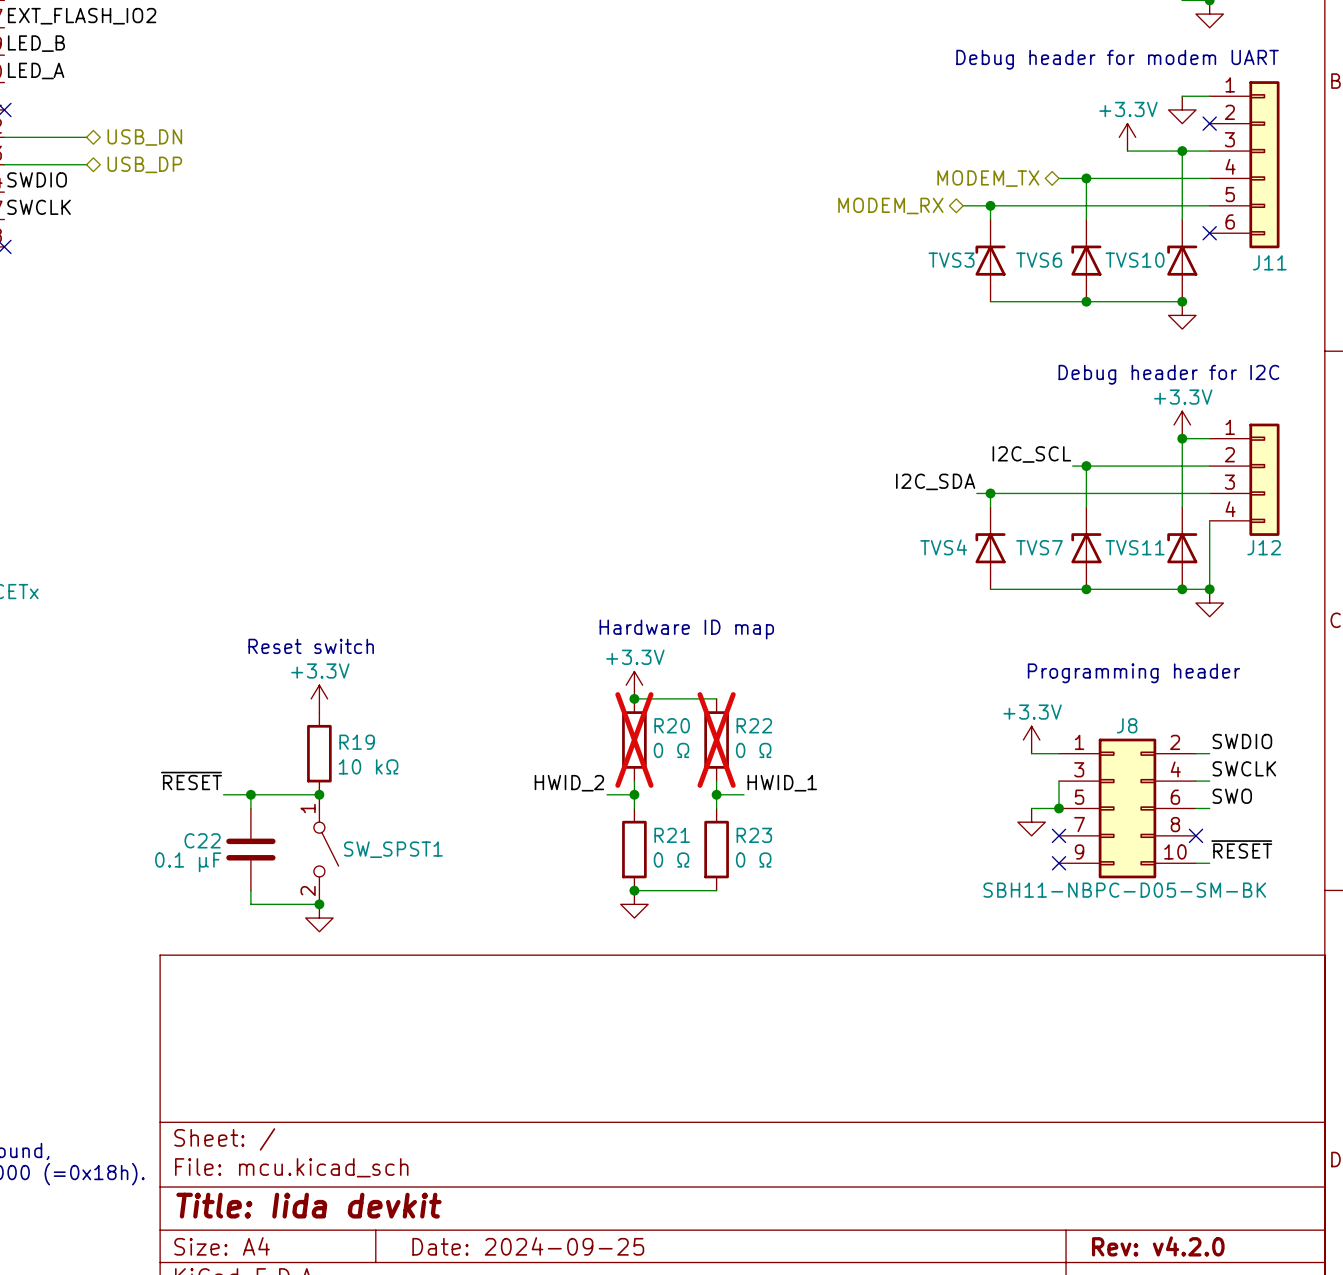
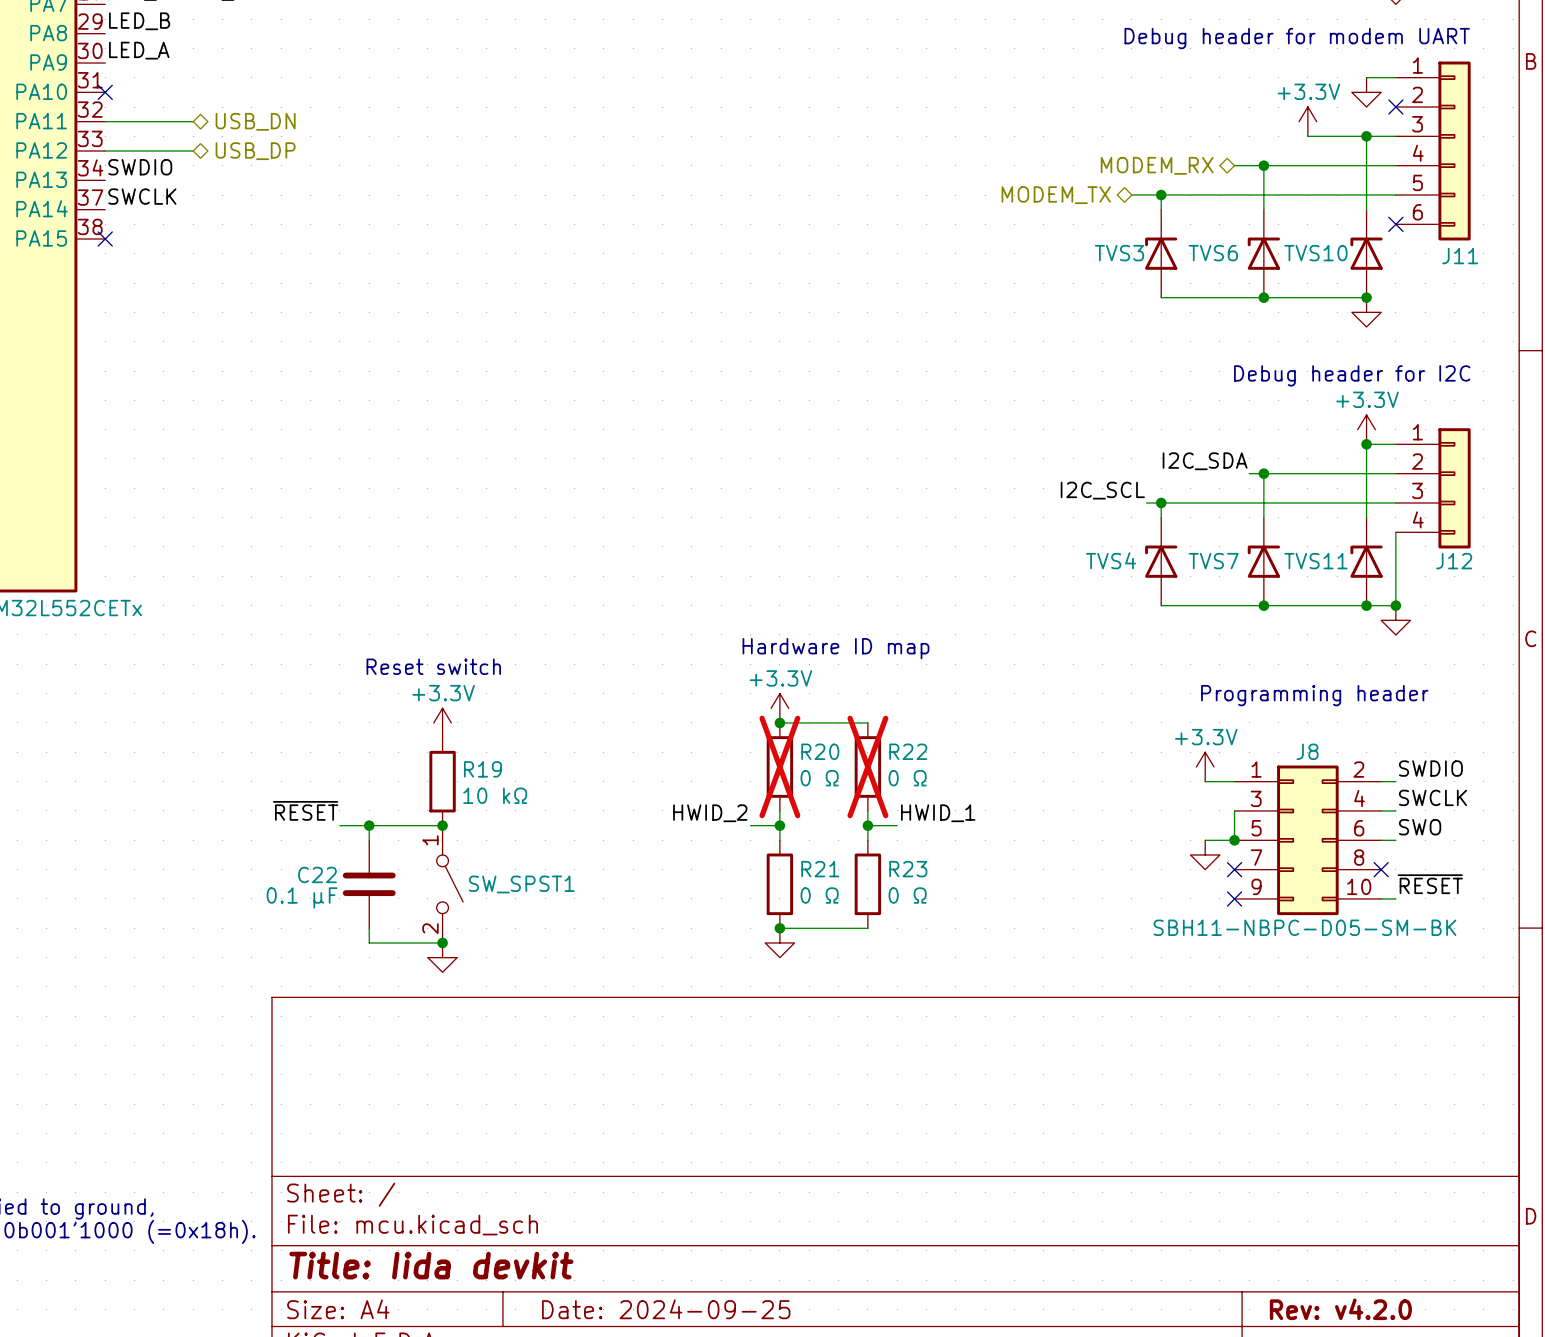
hierarchical label: MODEM_TX (988, 178) -> MODEM_RX (1157, 165)
hierarchical label: MODEM_RX (890, 205) -> MODEM_TX (1056, 195)
label: I2C_SCL (1031, 454) -> I2C_SDA (1205, 461)
label: I2C_SDA (935, 481) -> I2C_SCL (1102, 490)

